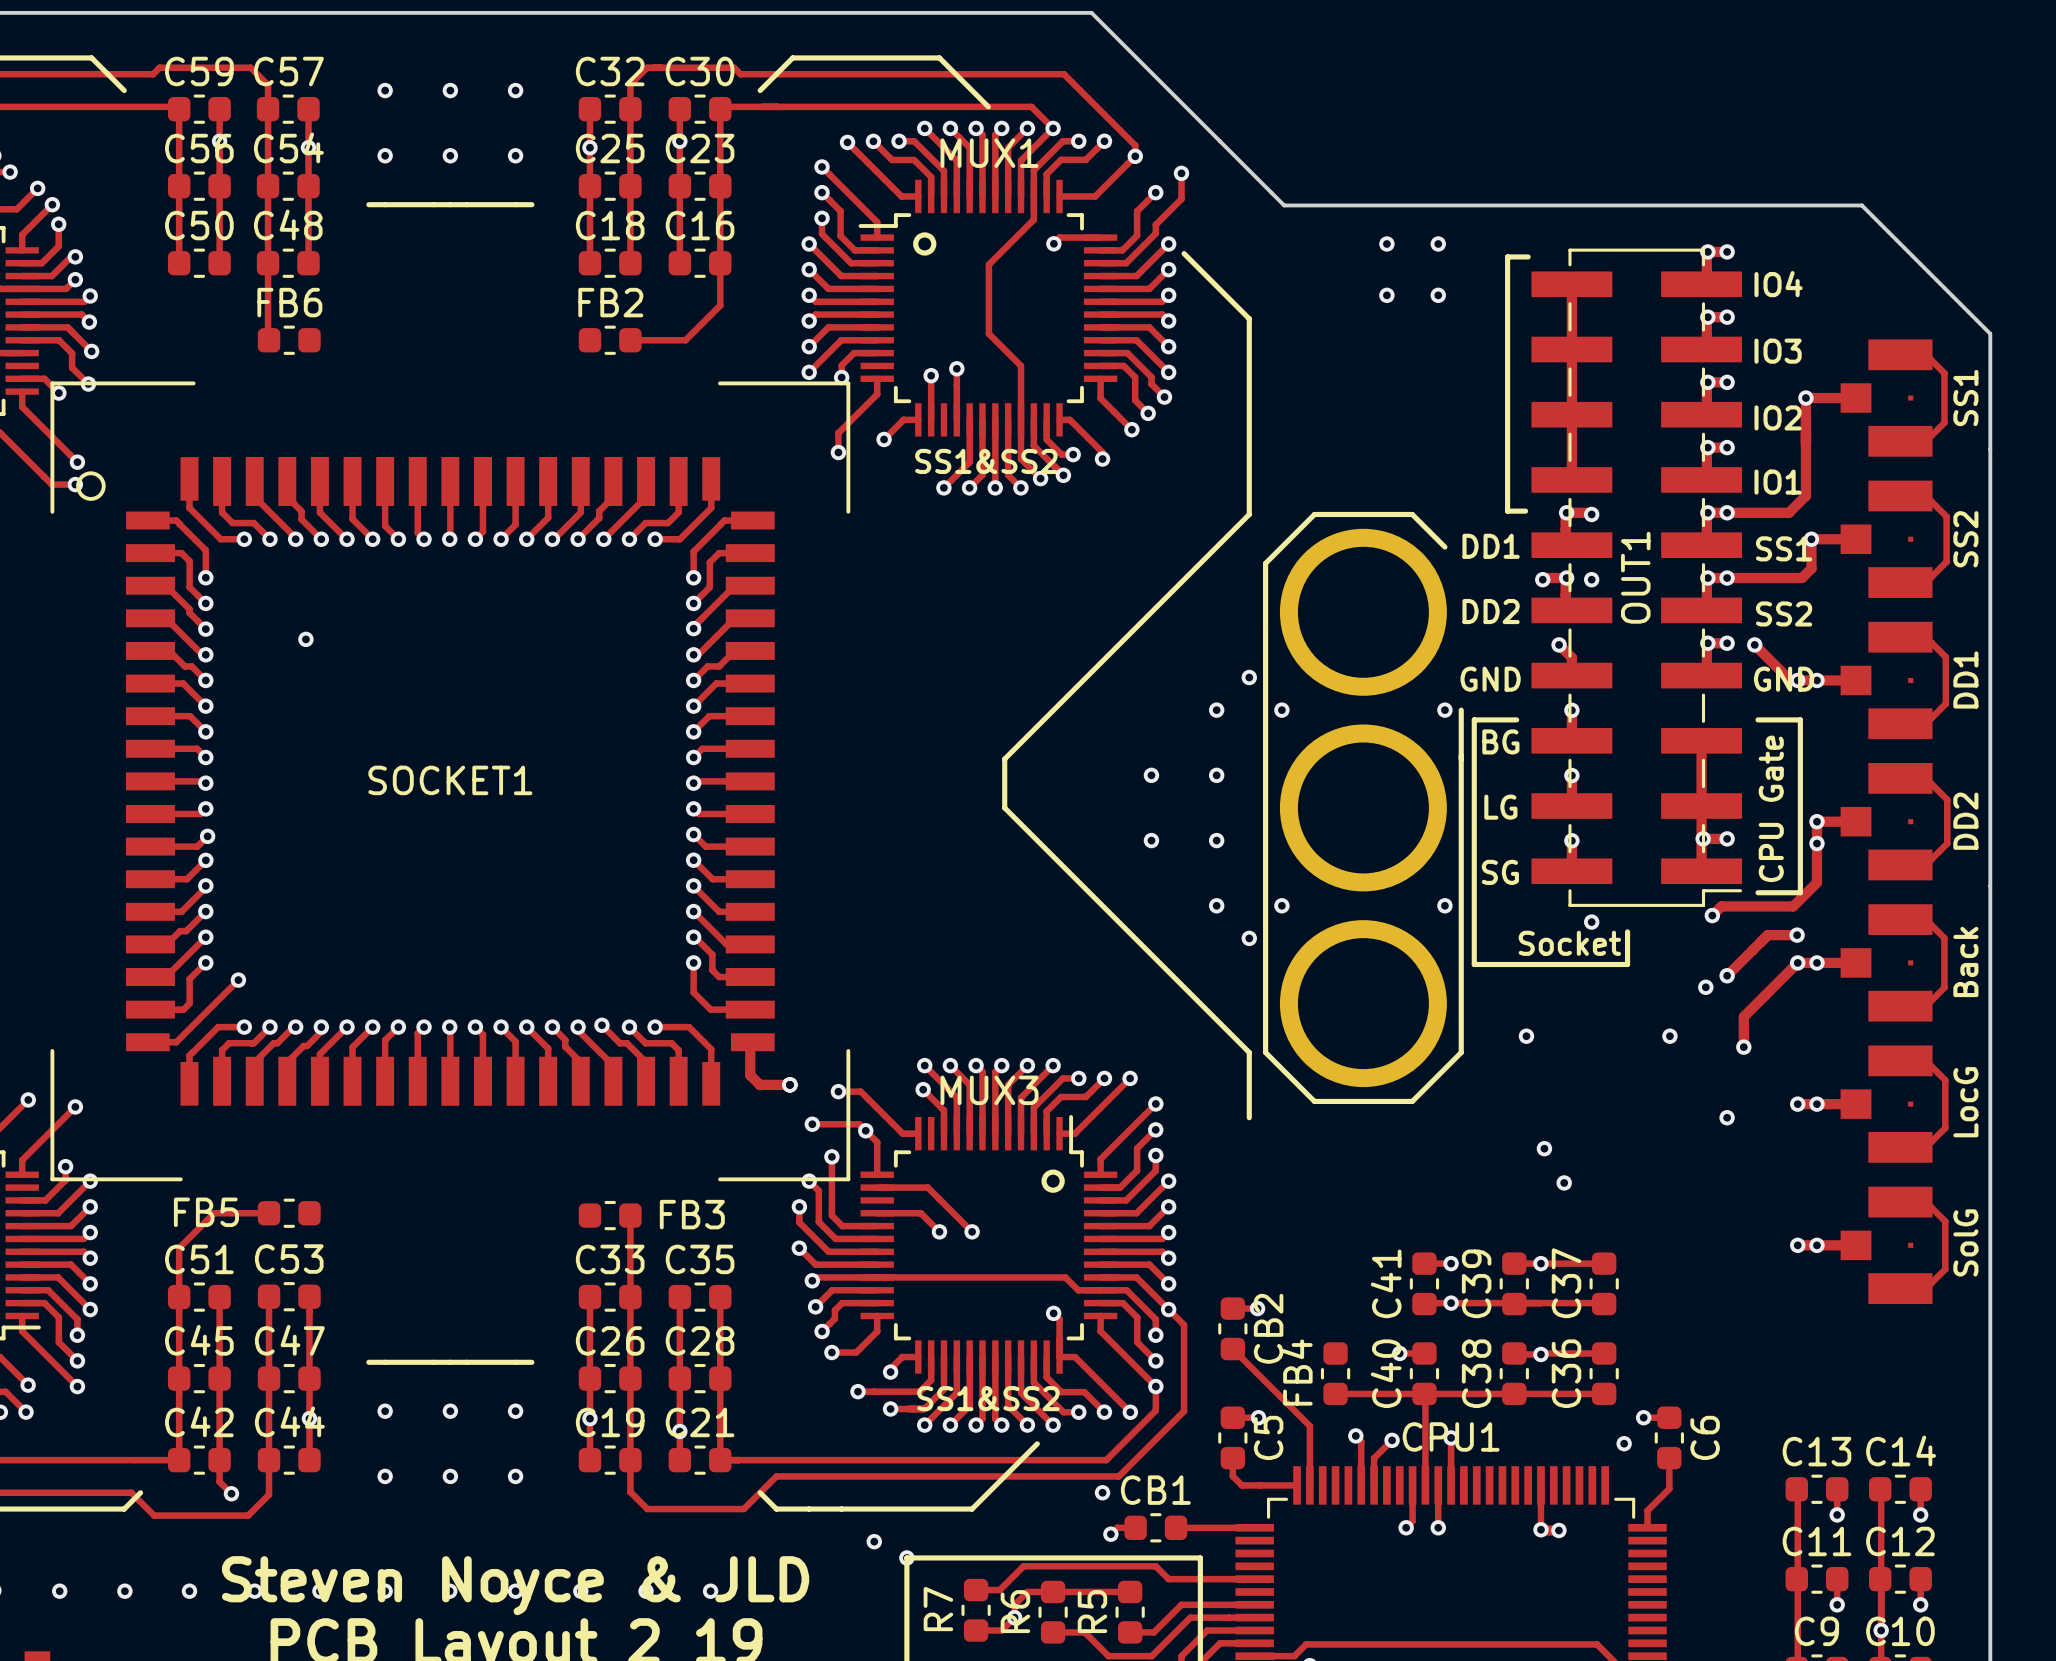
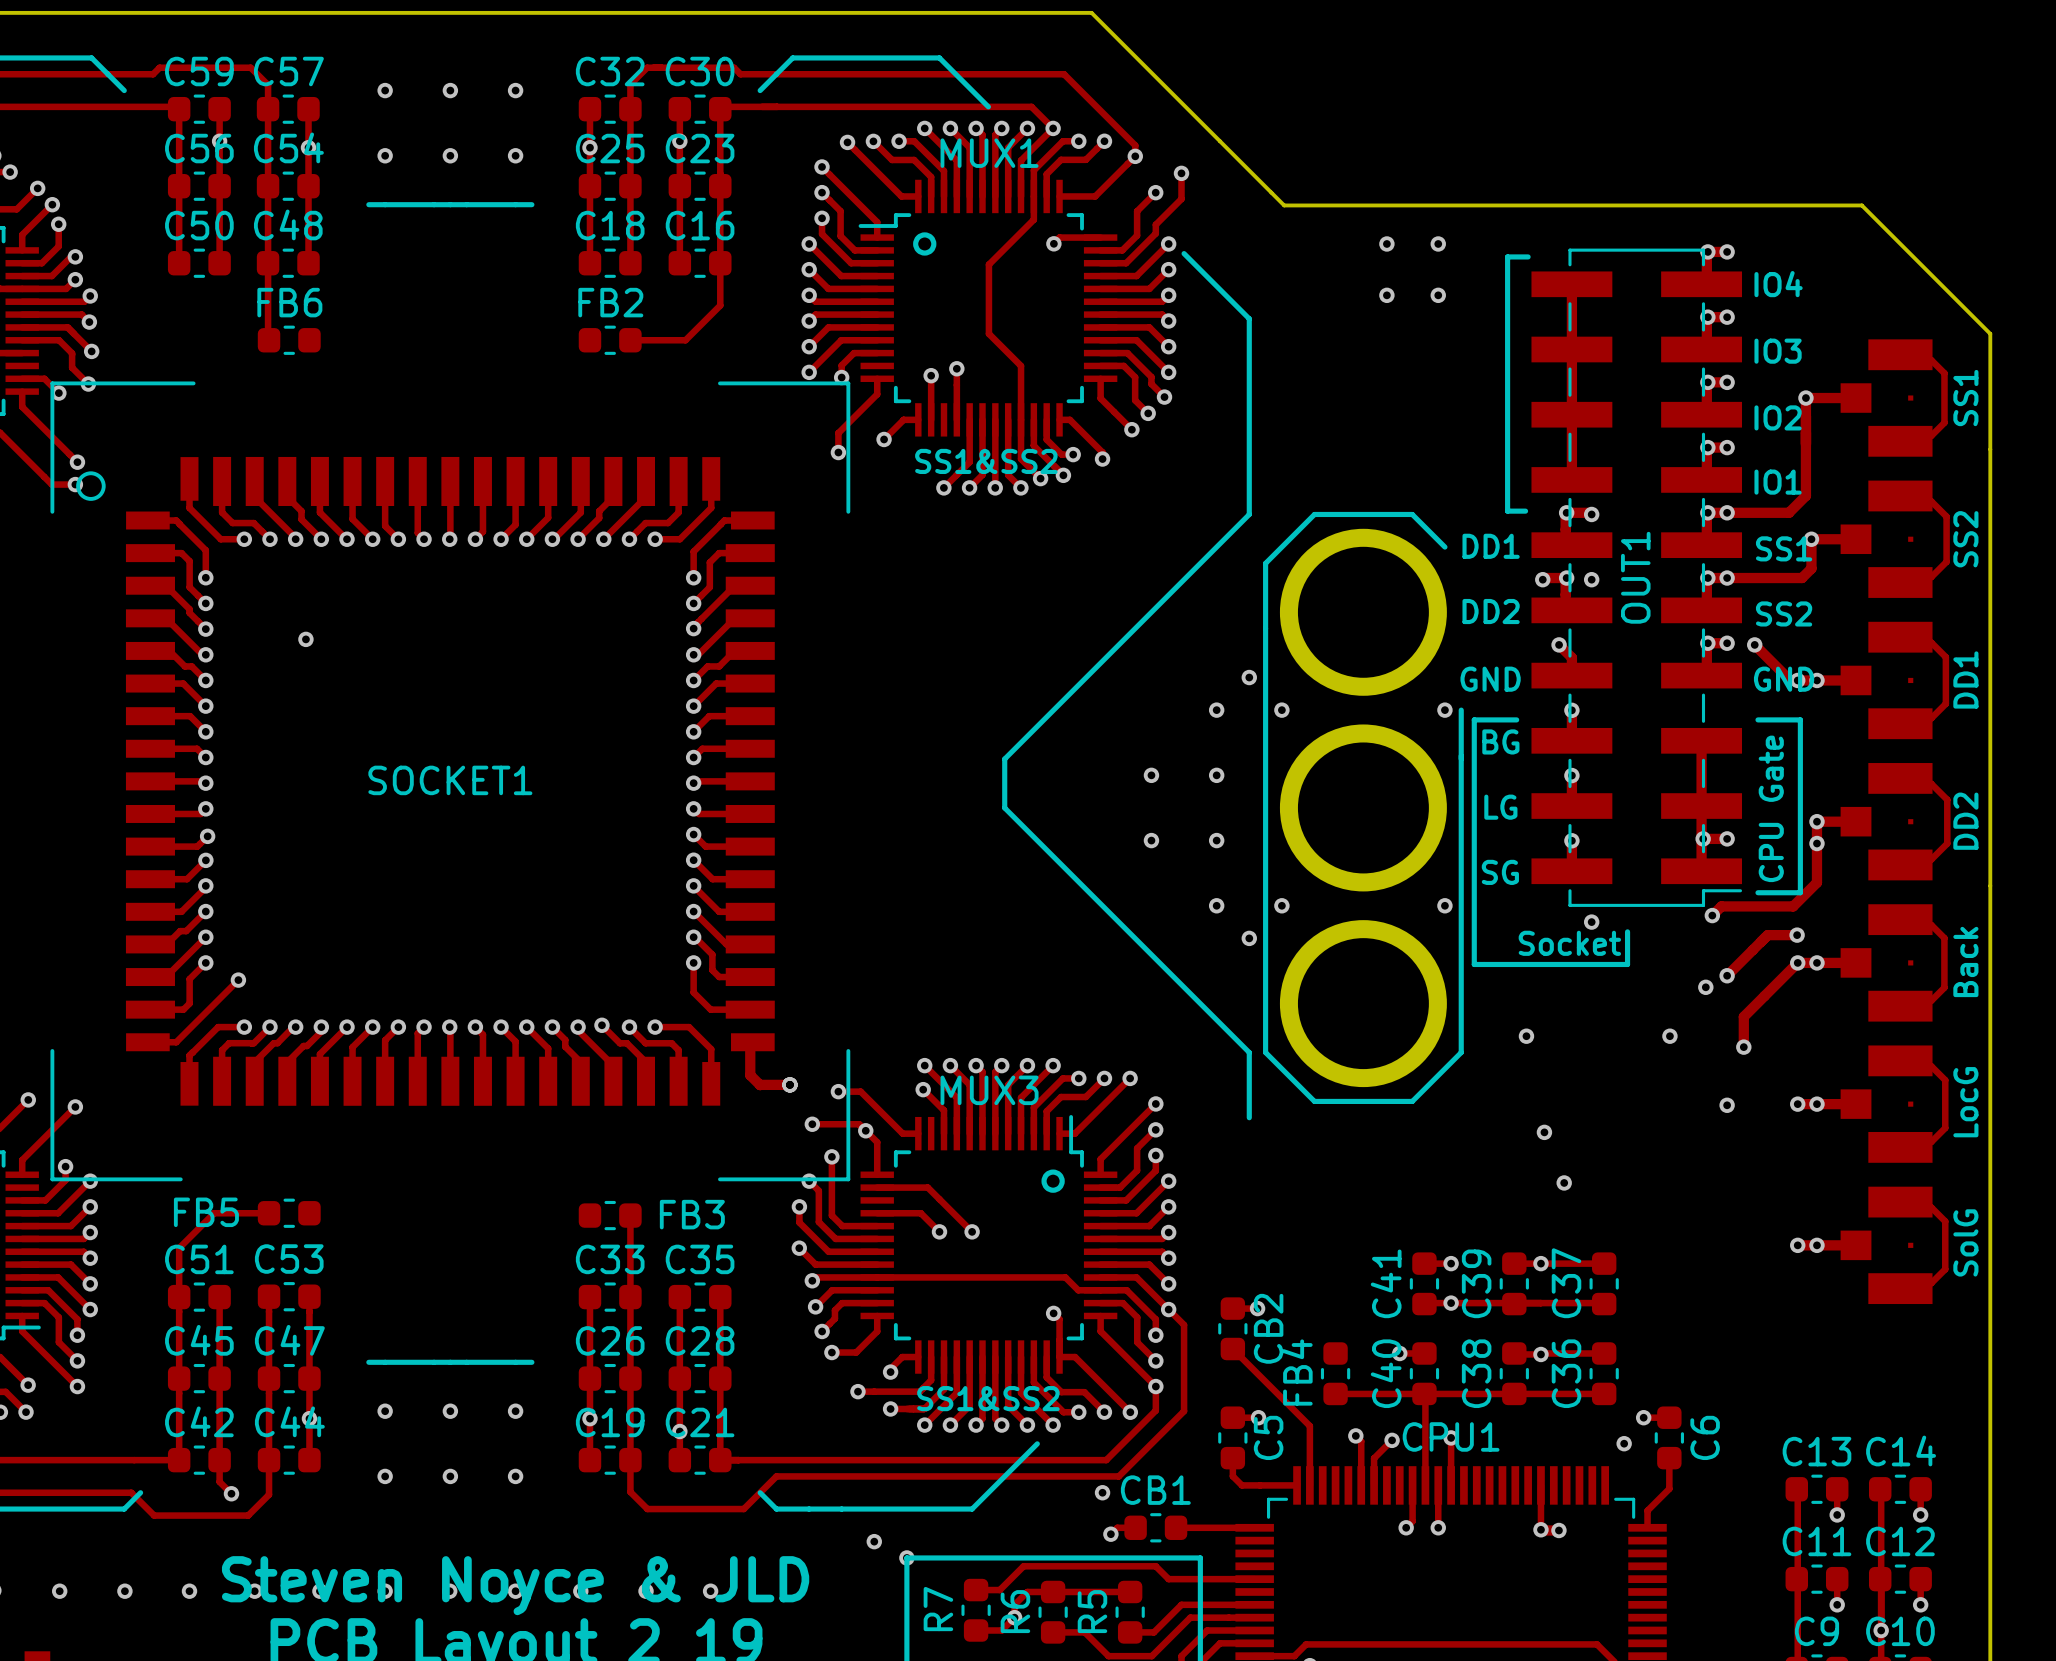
via position: (1727, 1117) -> (1727, 1105)
via position: (1544, 1148) -> (1544, 1132)

